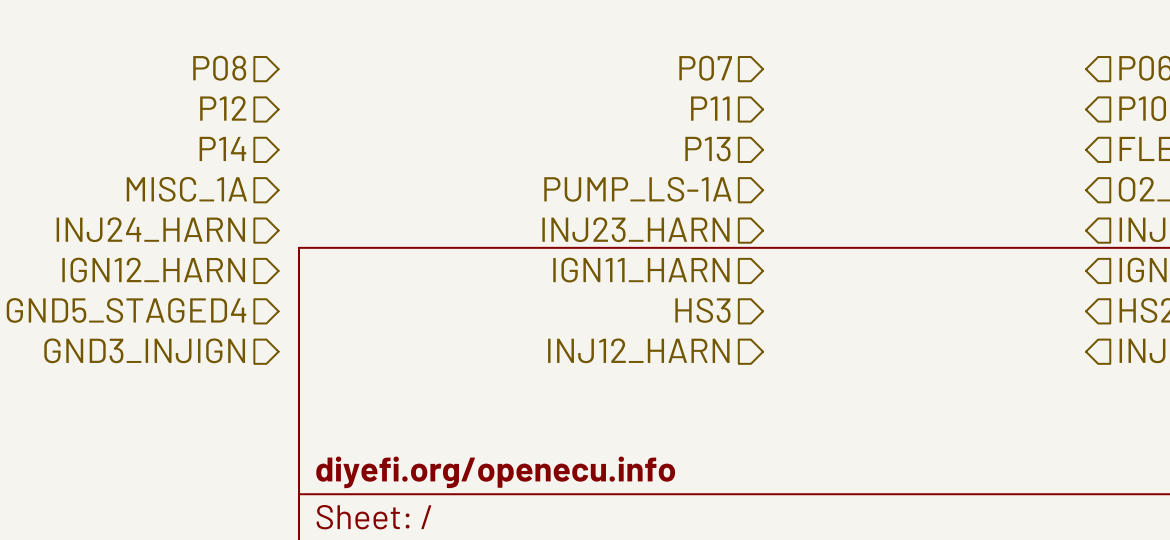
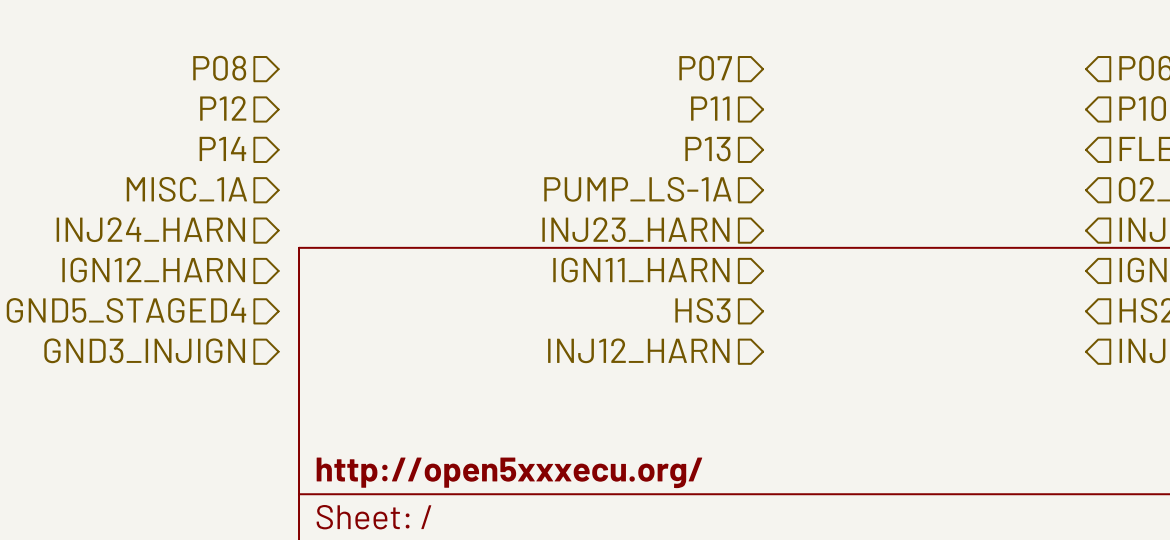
title block: diyefi.org/openecu.info (495, 472) -> http://open5xxxecu.org/ (509, 472)

